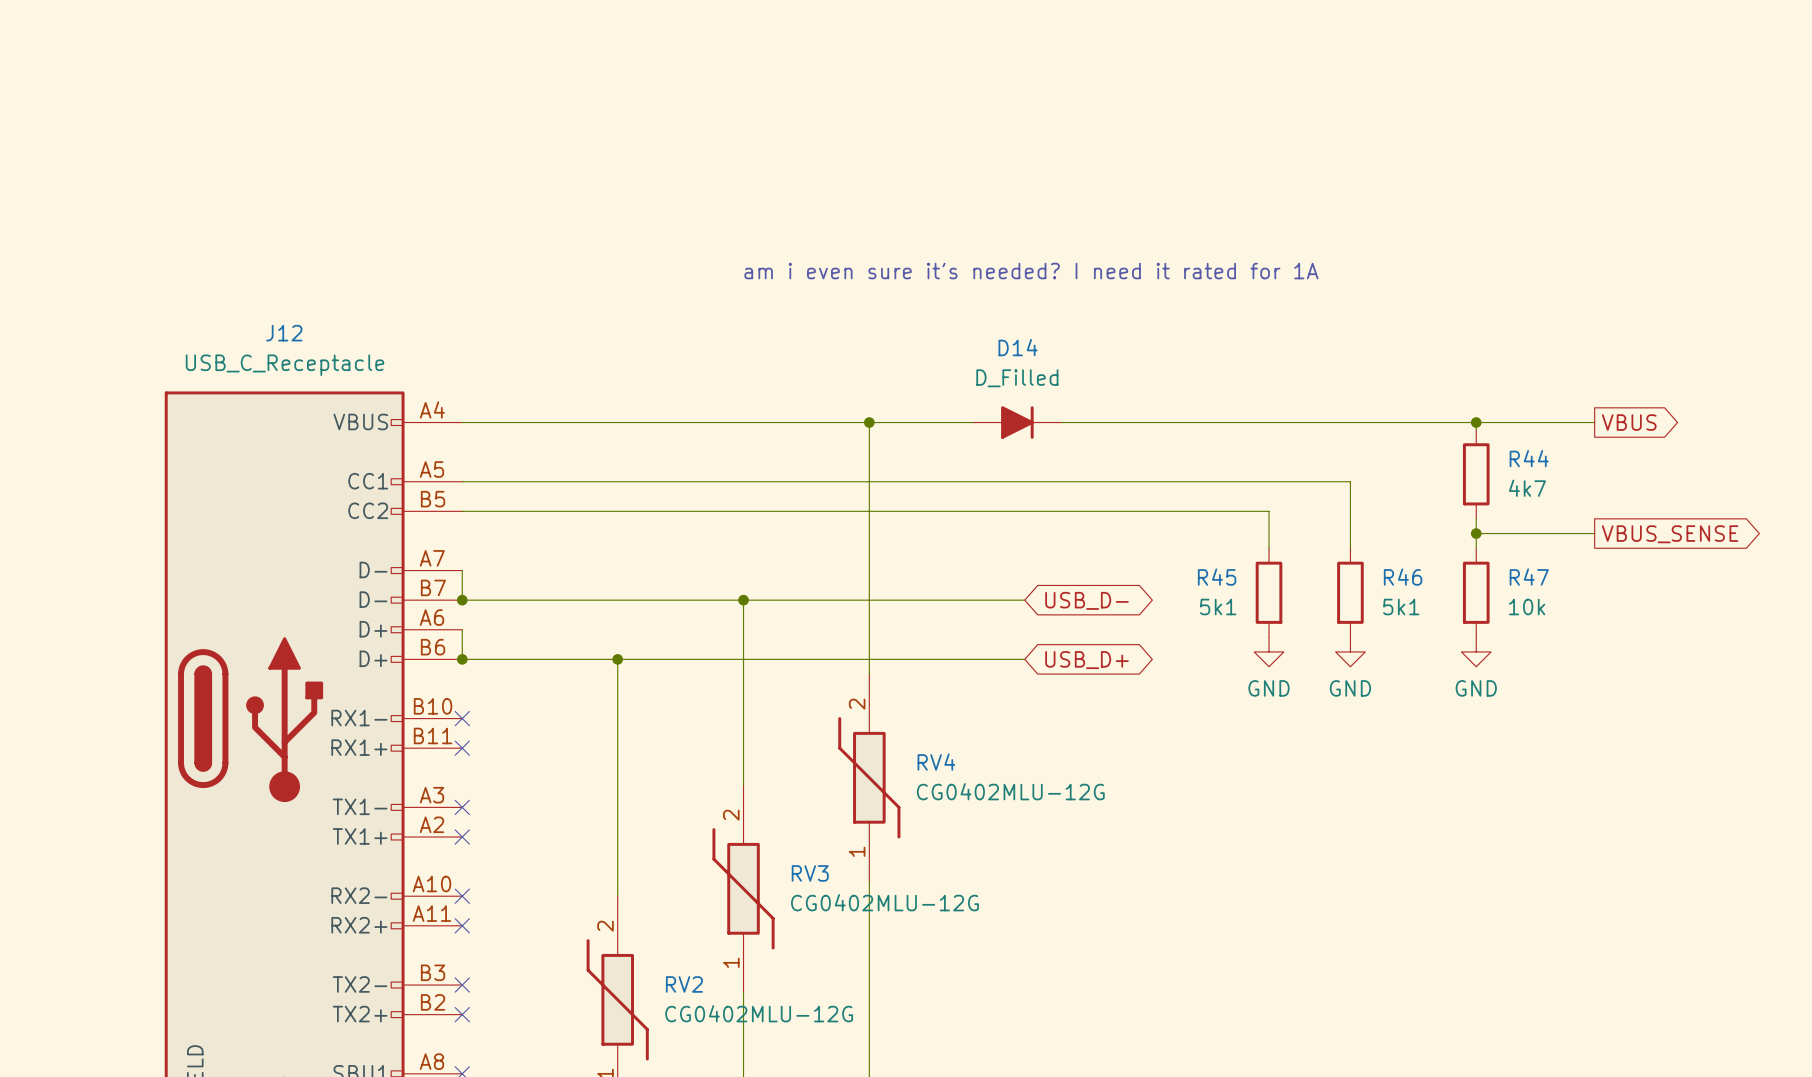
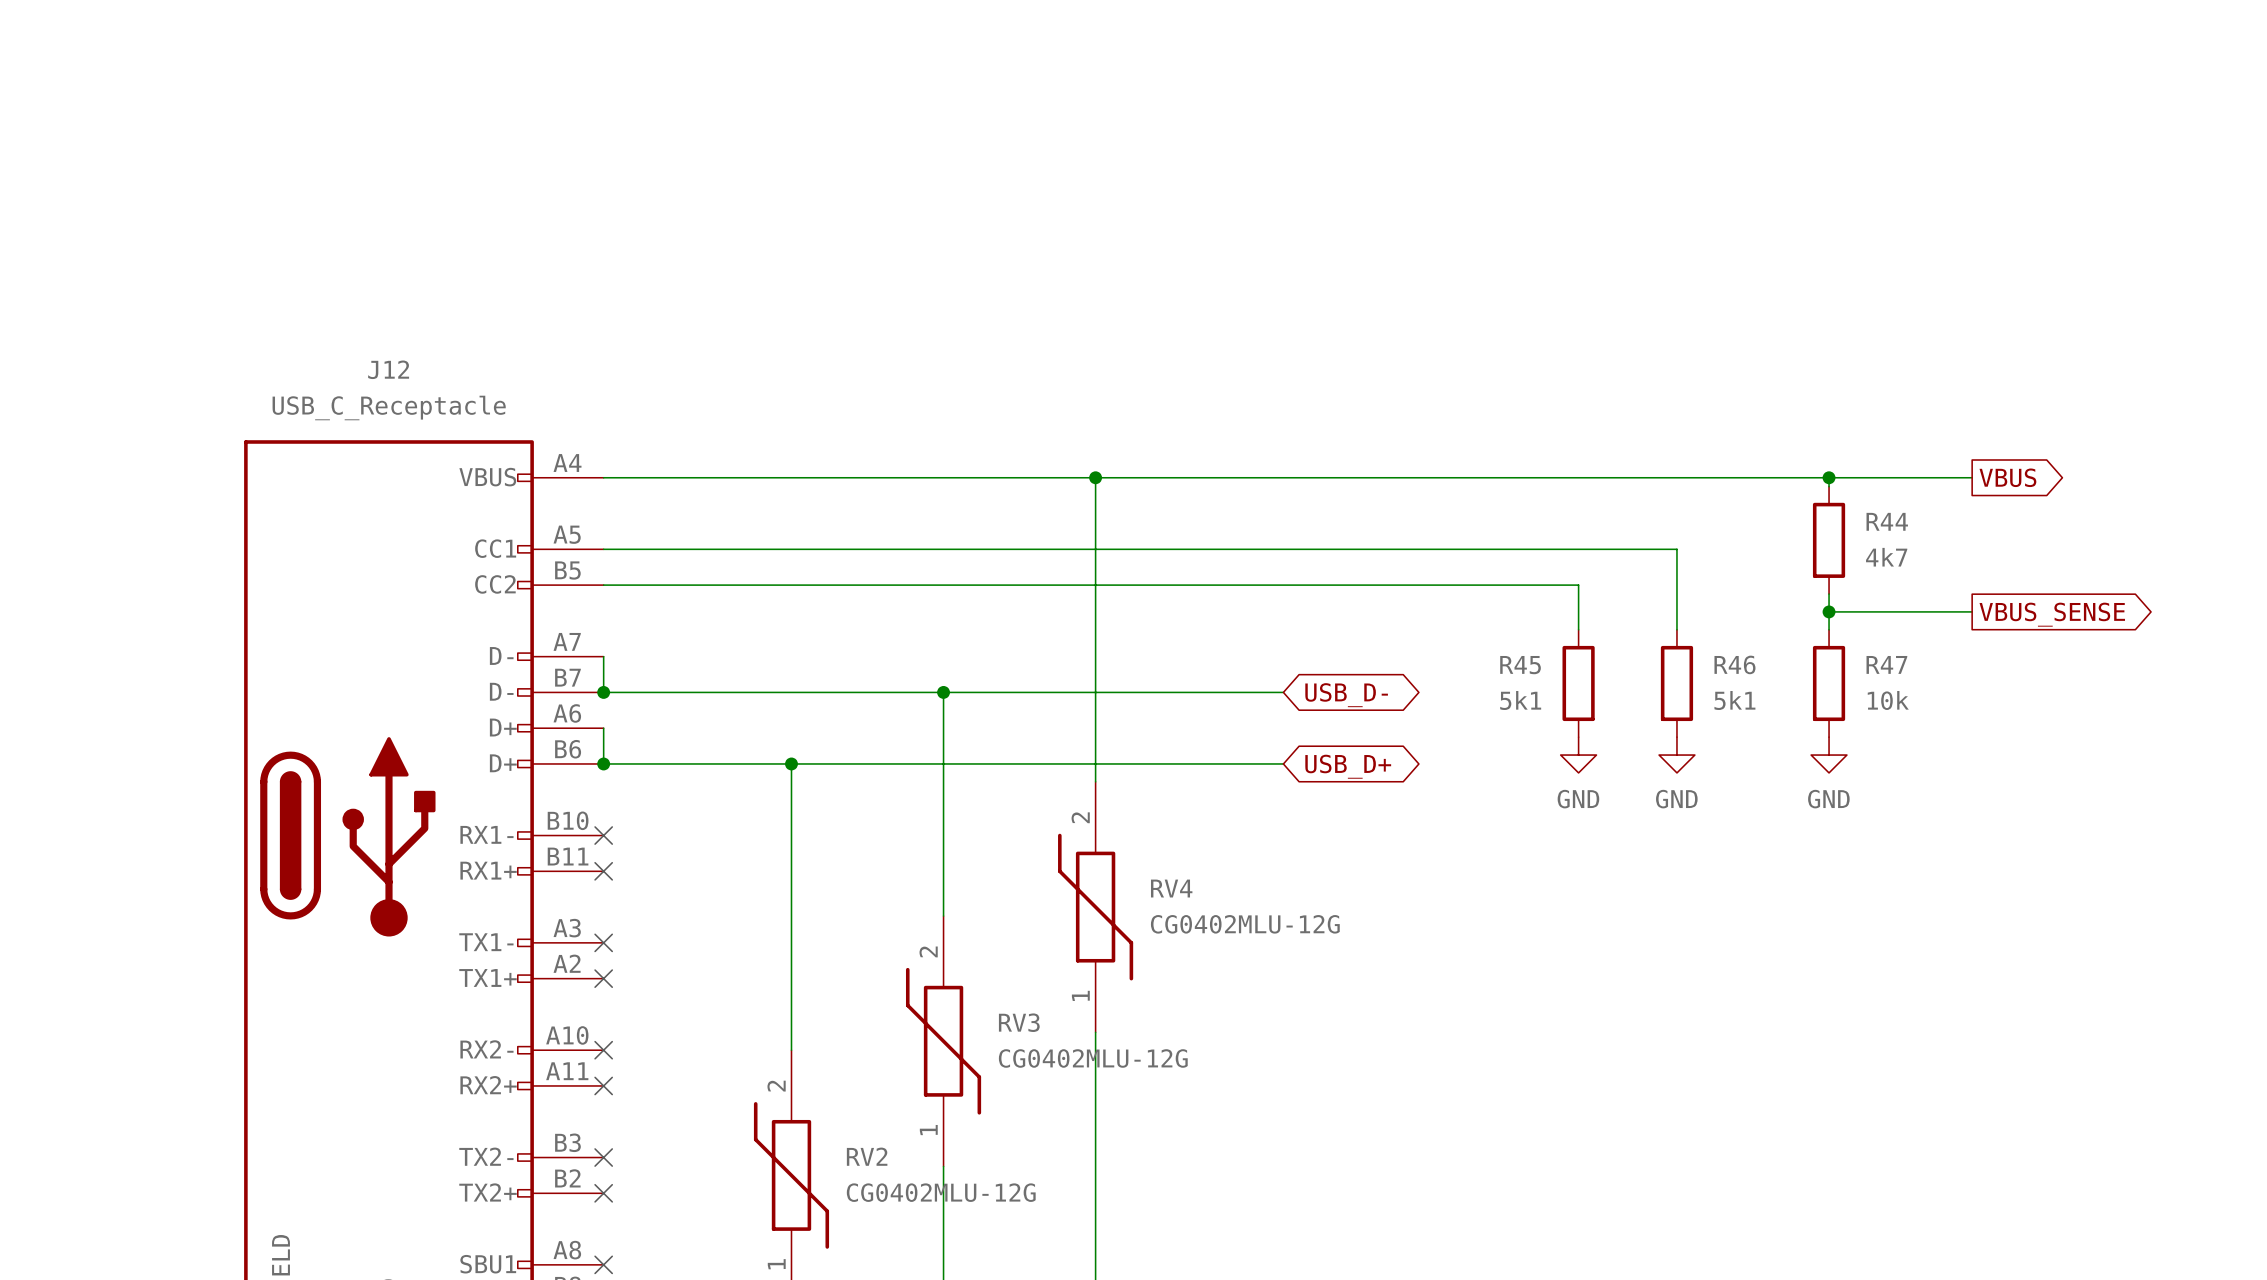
text: am i even sure it's needed? I need it rated for 1A (1031, 271) -> none
D14: D_Filled (1017, 422) -> none

